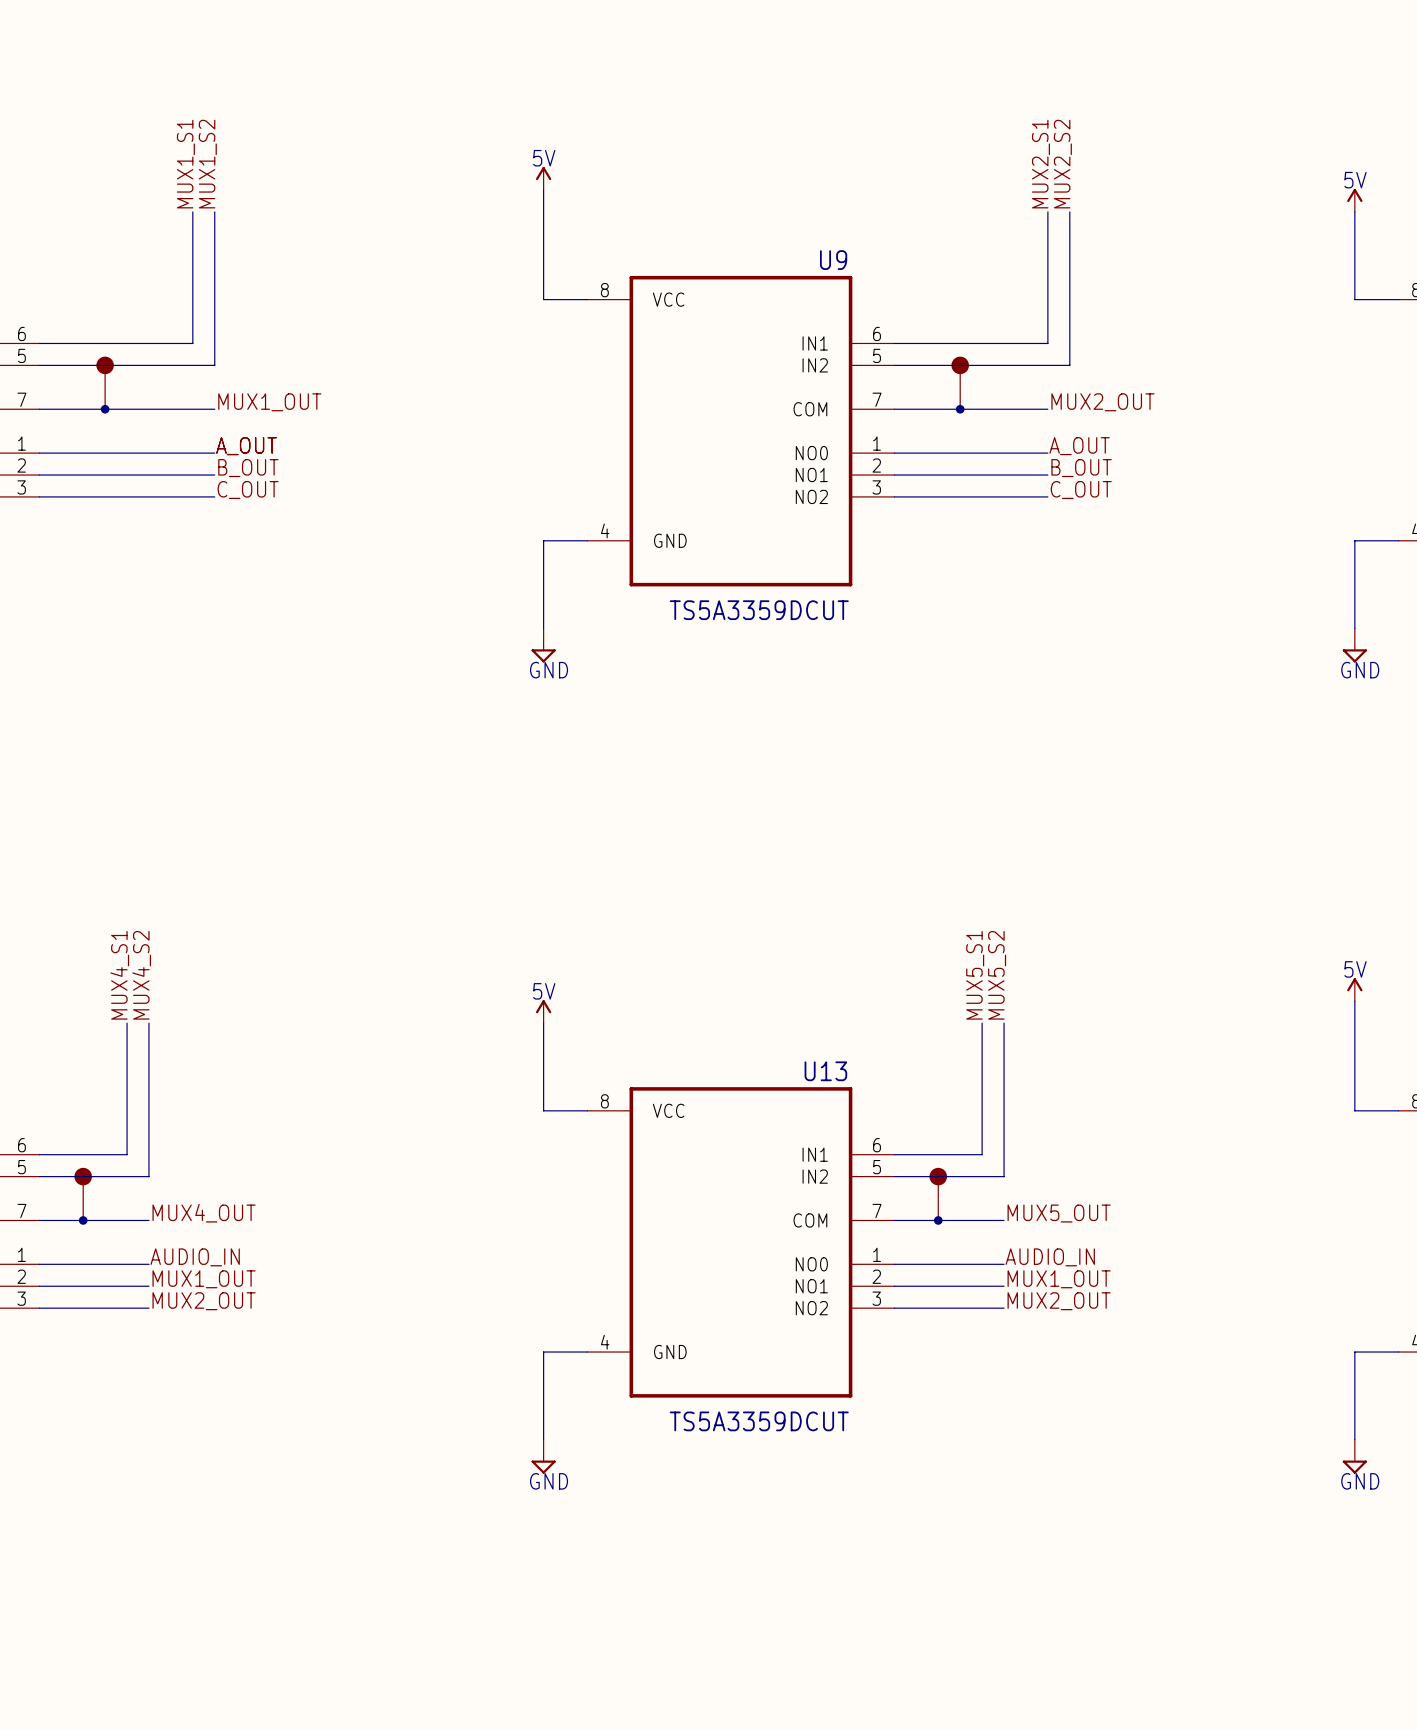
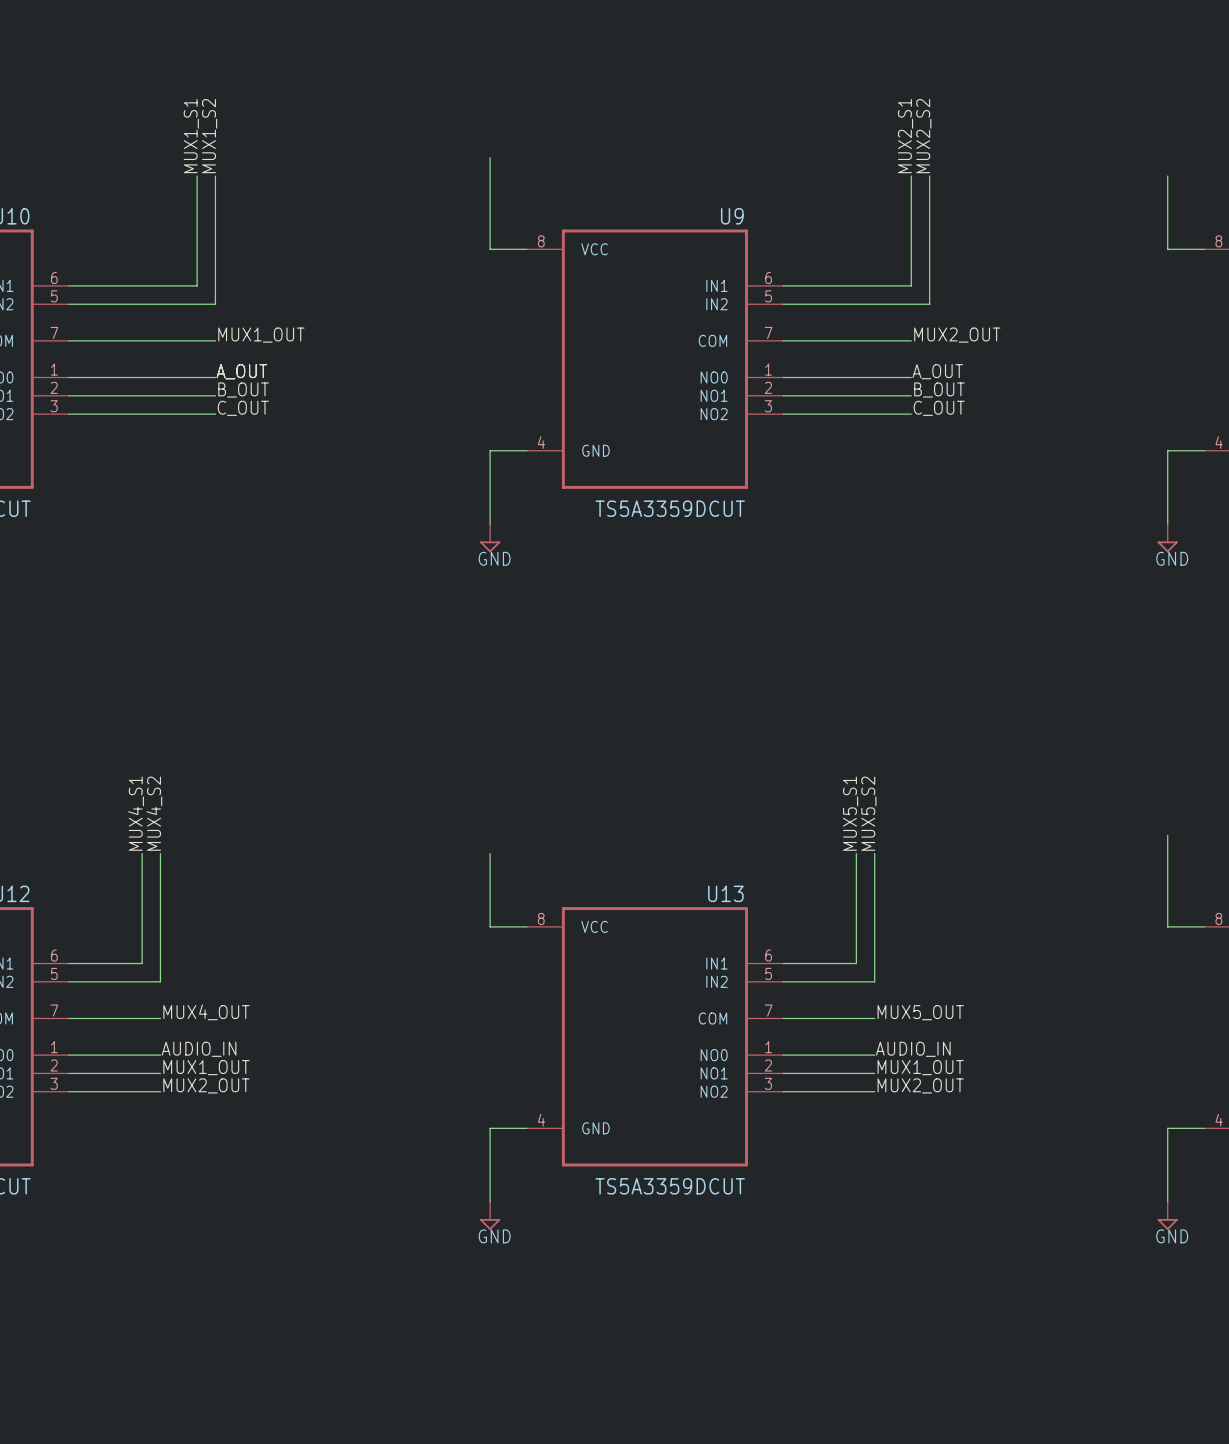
power symbol: 5V (543, 178) -> none
power symbol: 5V (1354, 200) -> none
part: (105, 382) -> none
part: (960, 382) -> none
junction: (105, 409) -> none
junction: (960, 409) -> none
power symbol: 5V (1354, 989) -> none
power symbol: 5V (543, 1011) -> none
part: (83, 1194) -> none
part: (938, 1194) -> none
junction: (83, 1220) -> none
junction: (938, 1220) -> none

